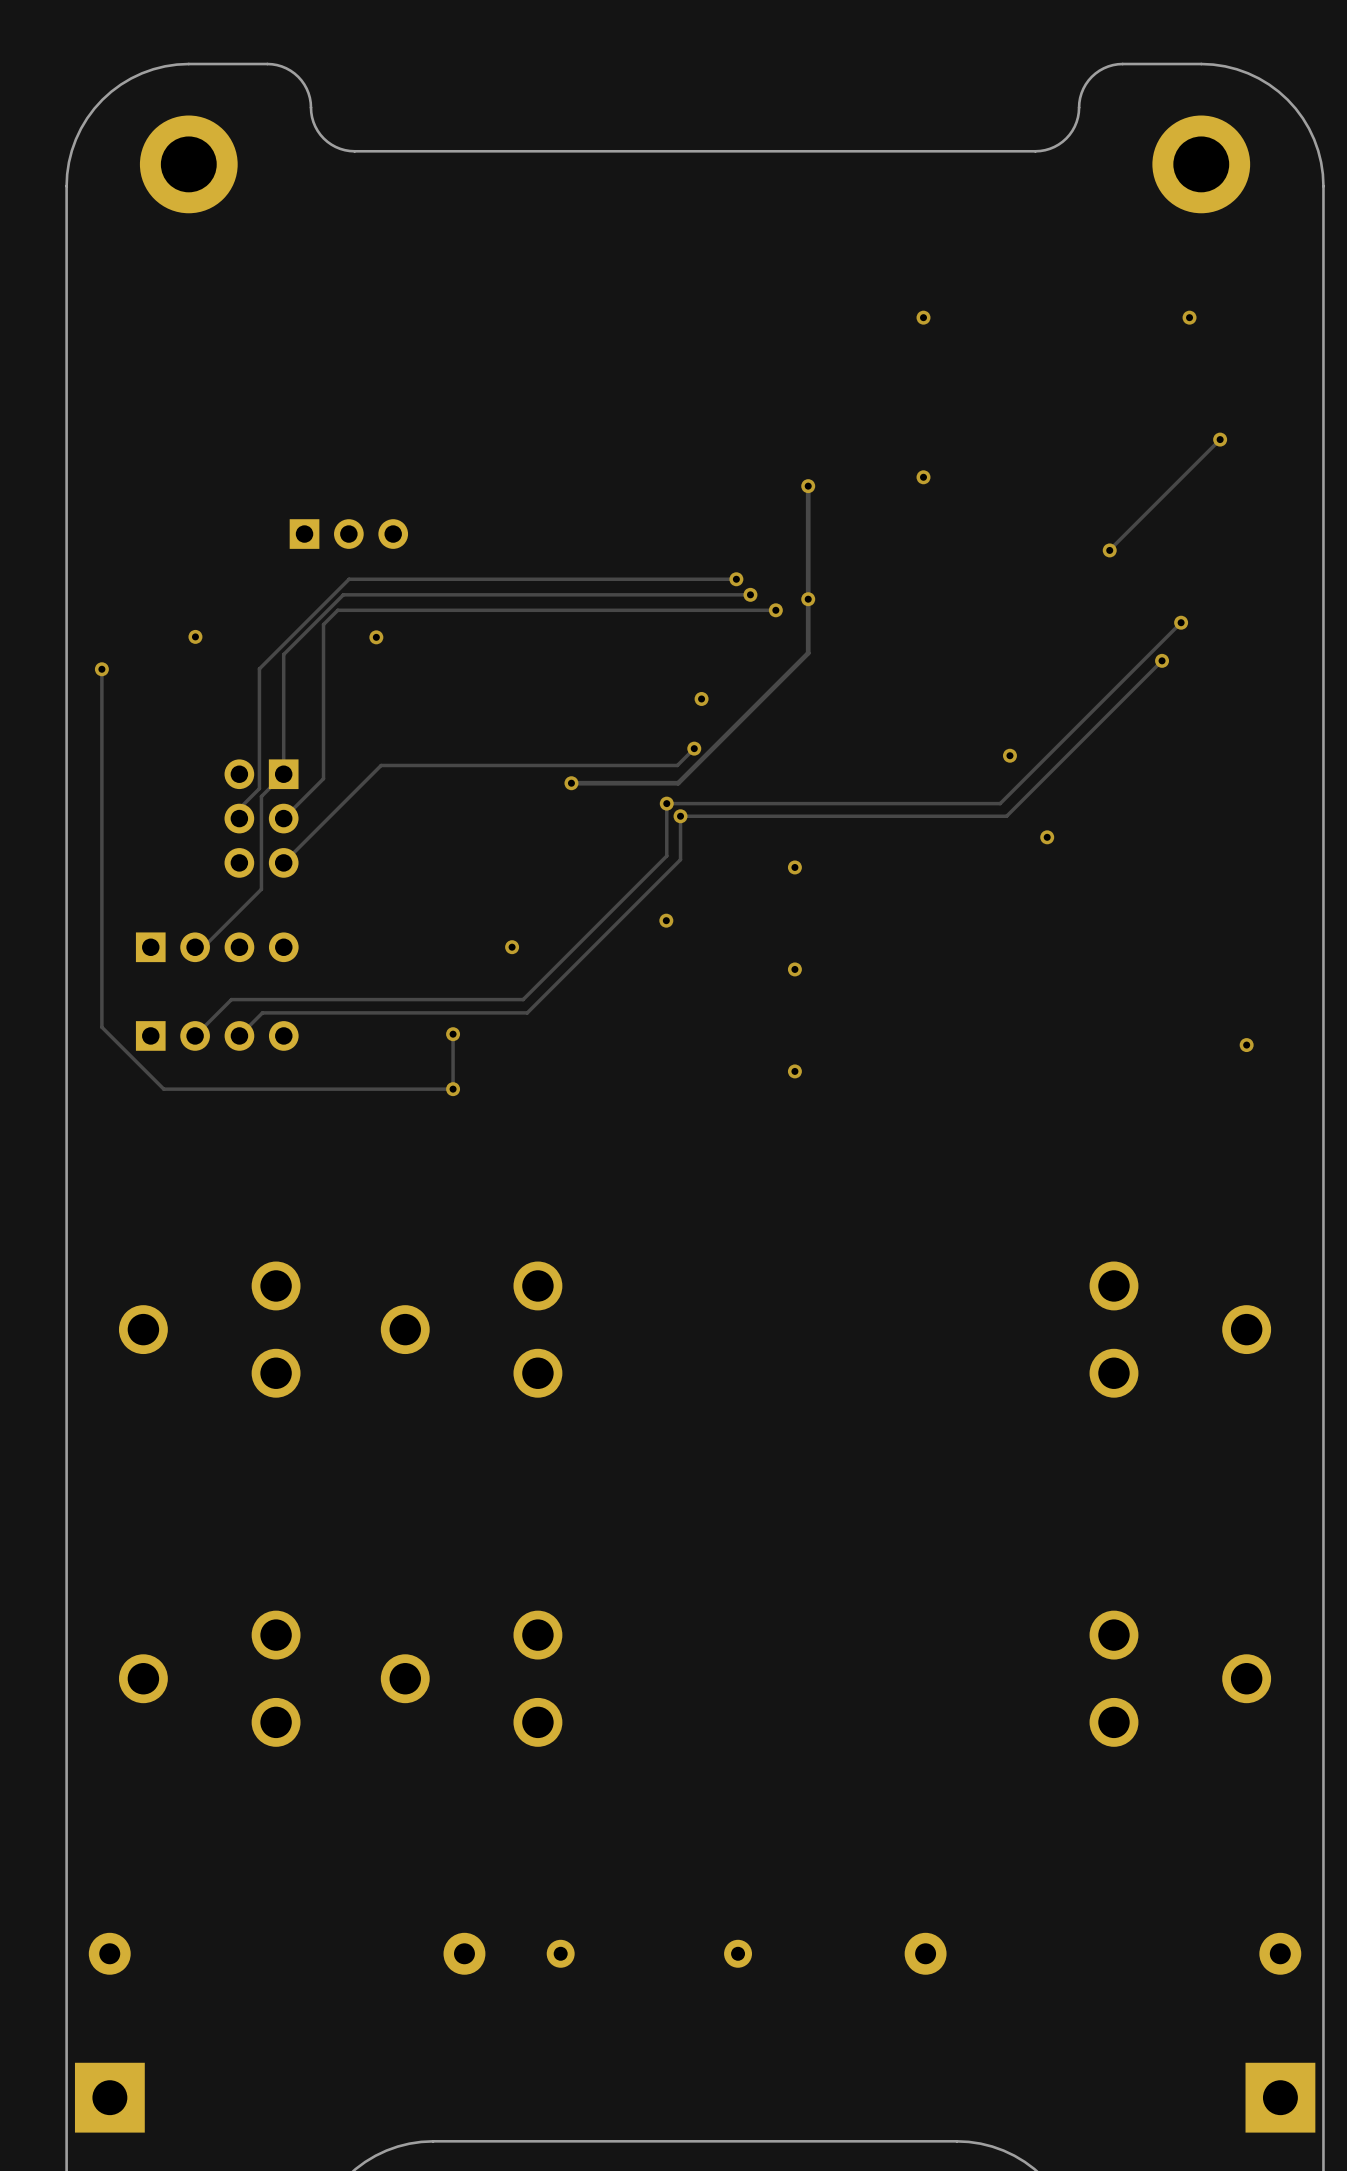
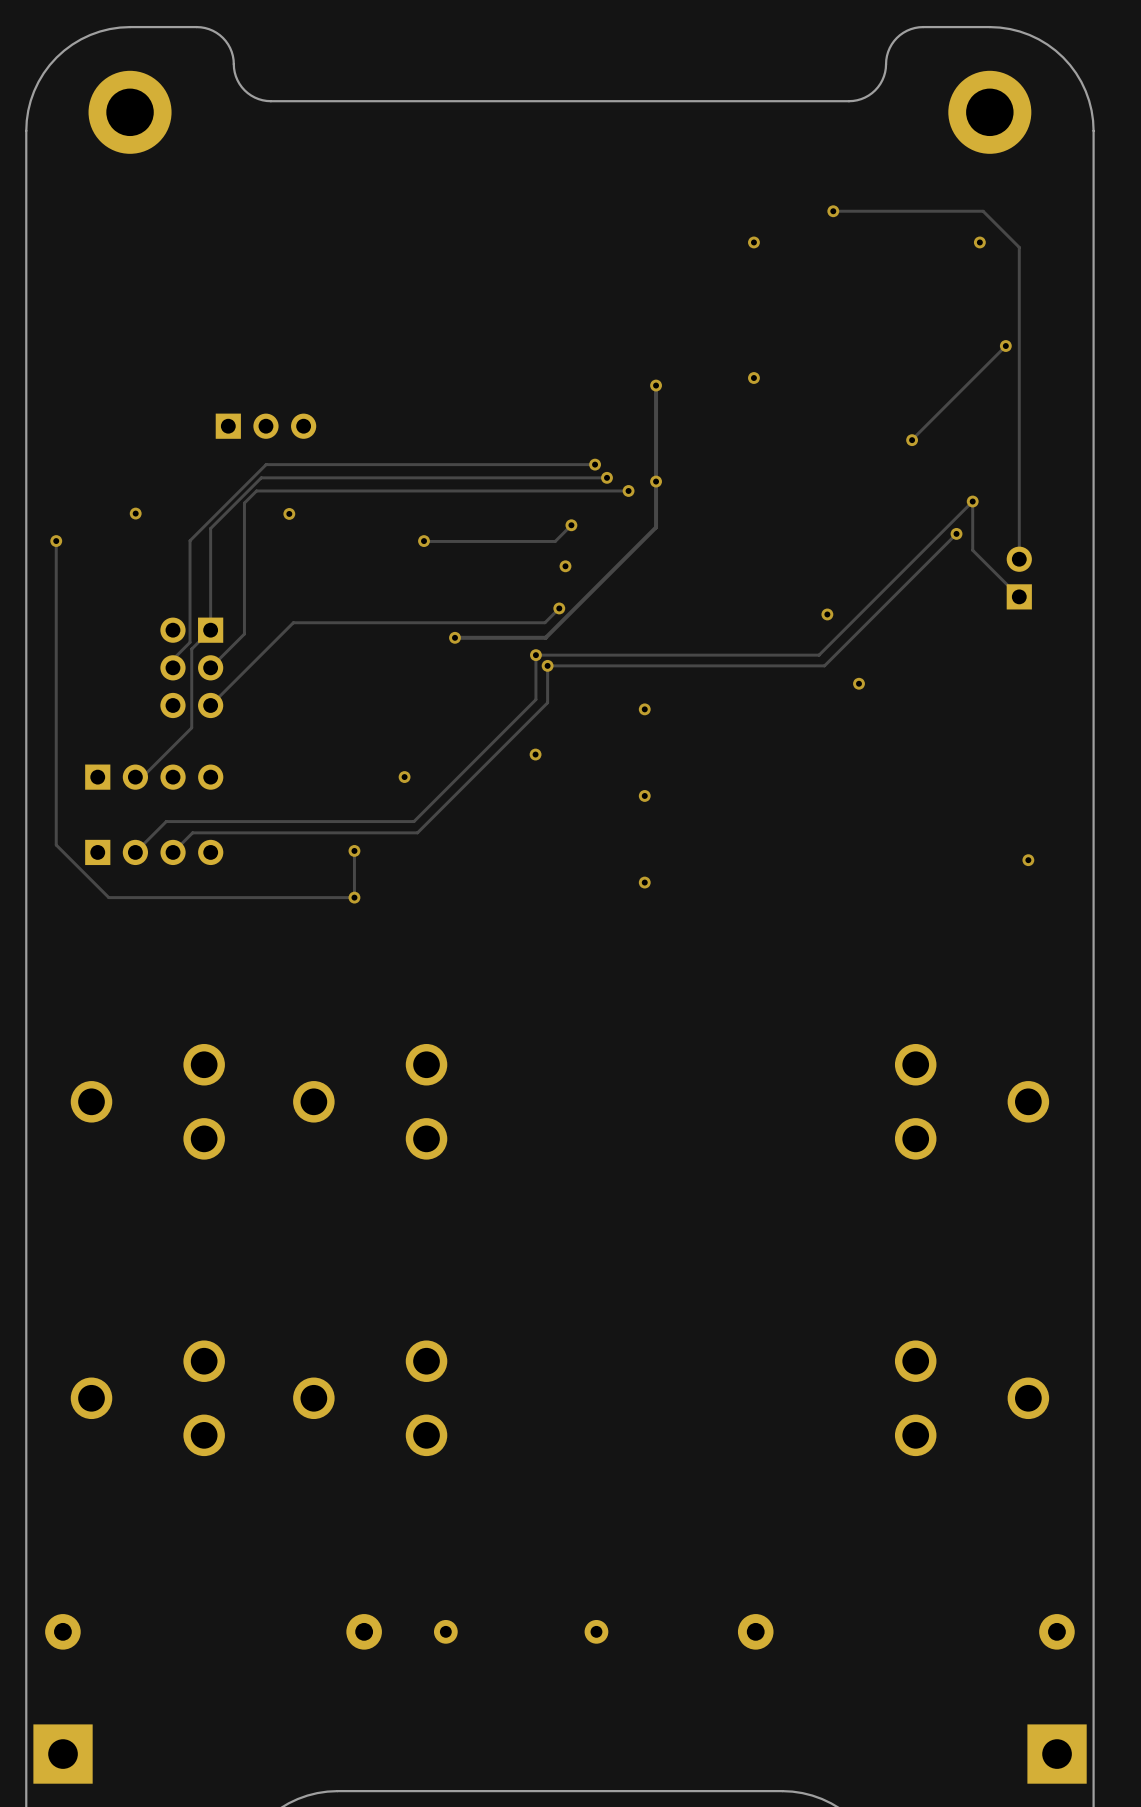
track: none -> (833, 211) (983, 211) (1019, 247) (1019, 559)
via: none -> (833, 211)
track: none -> (972, 501) (972, 550) (1019, 596)
track: none -> (571, 525) (555, 541) (424, 541)
via: none -> (571, 525)
via: none -> (424, 541)
part: none -> (1019, 578)

